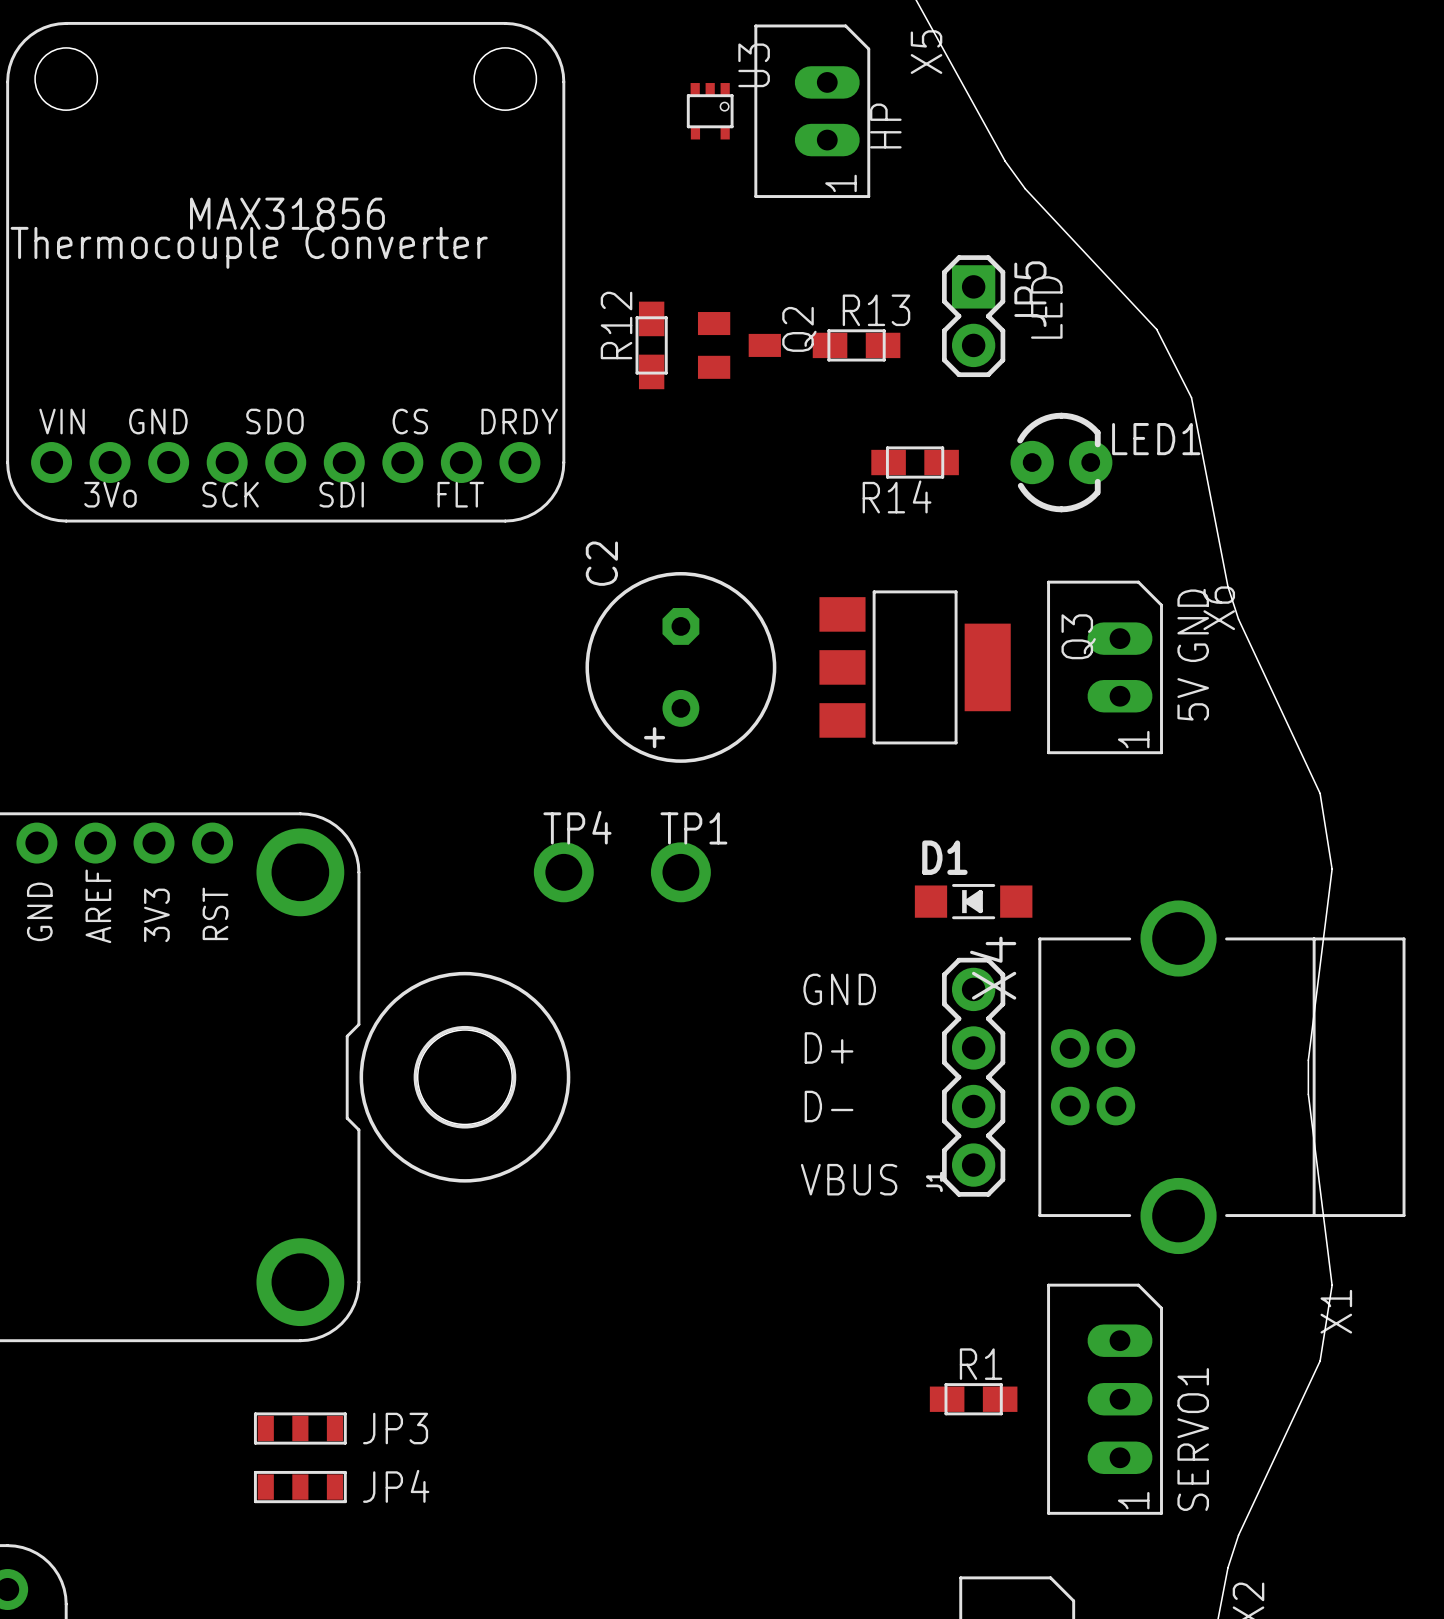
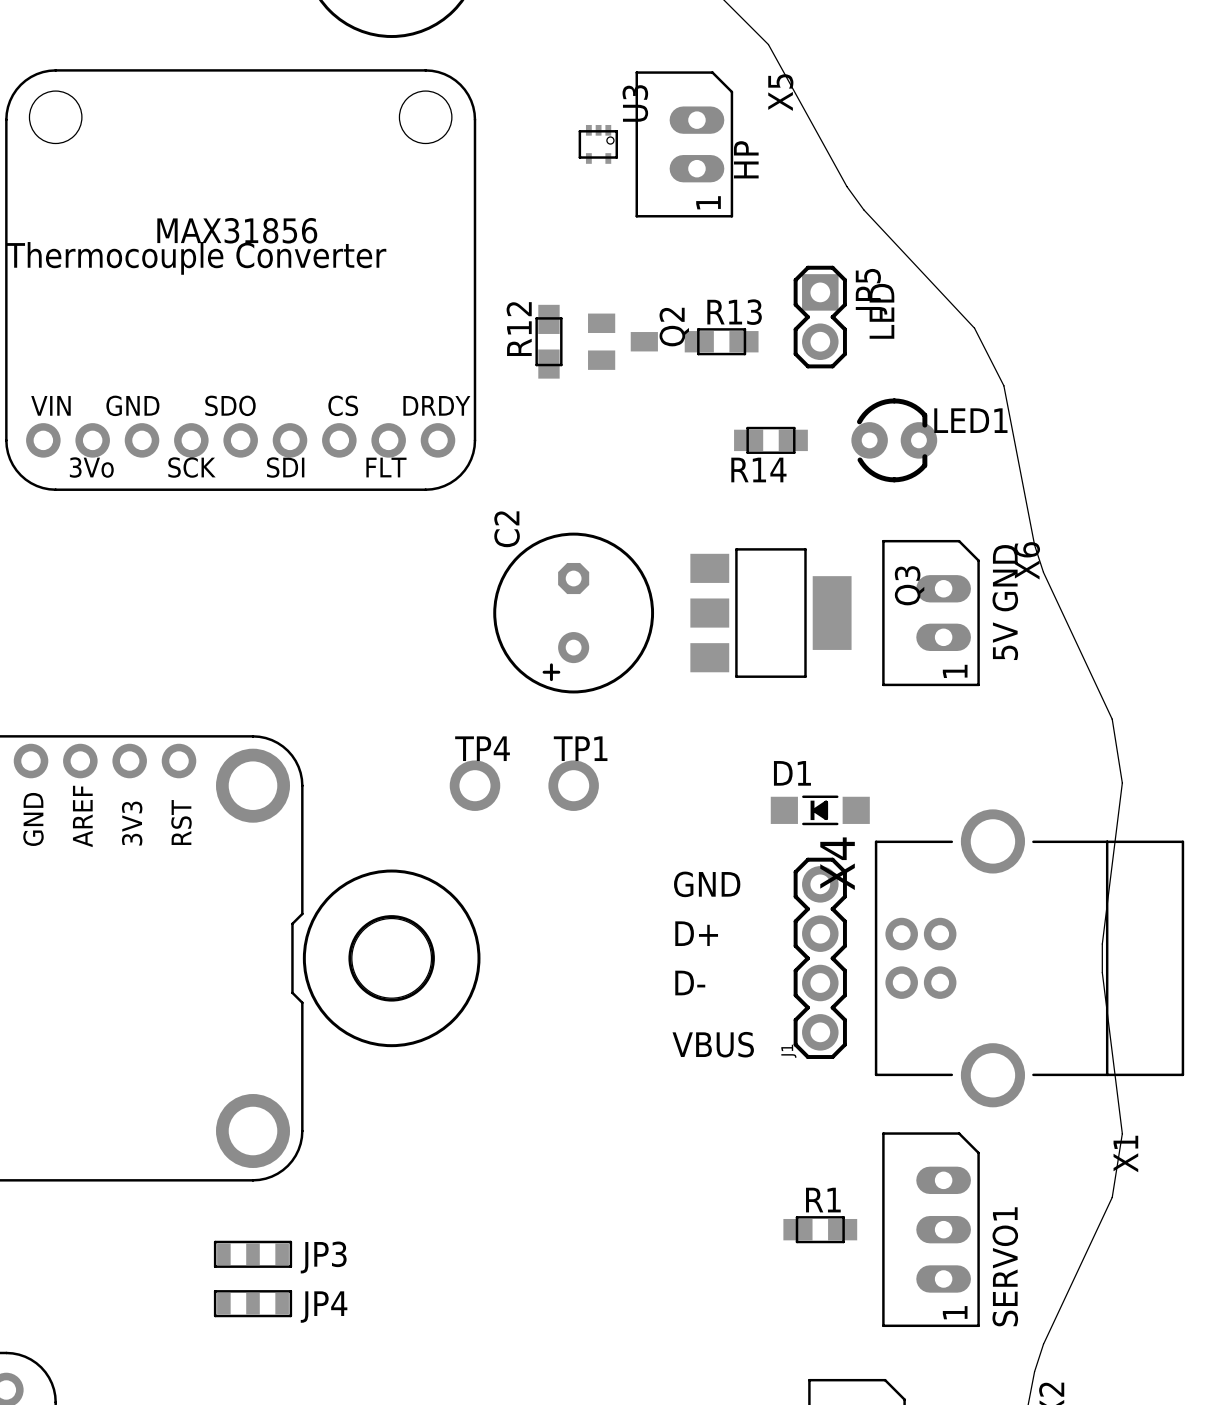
U3 footprint: [686, 83, 734, 140] -> [578, 124, 618, 164]

